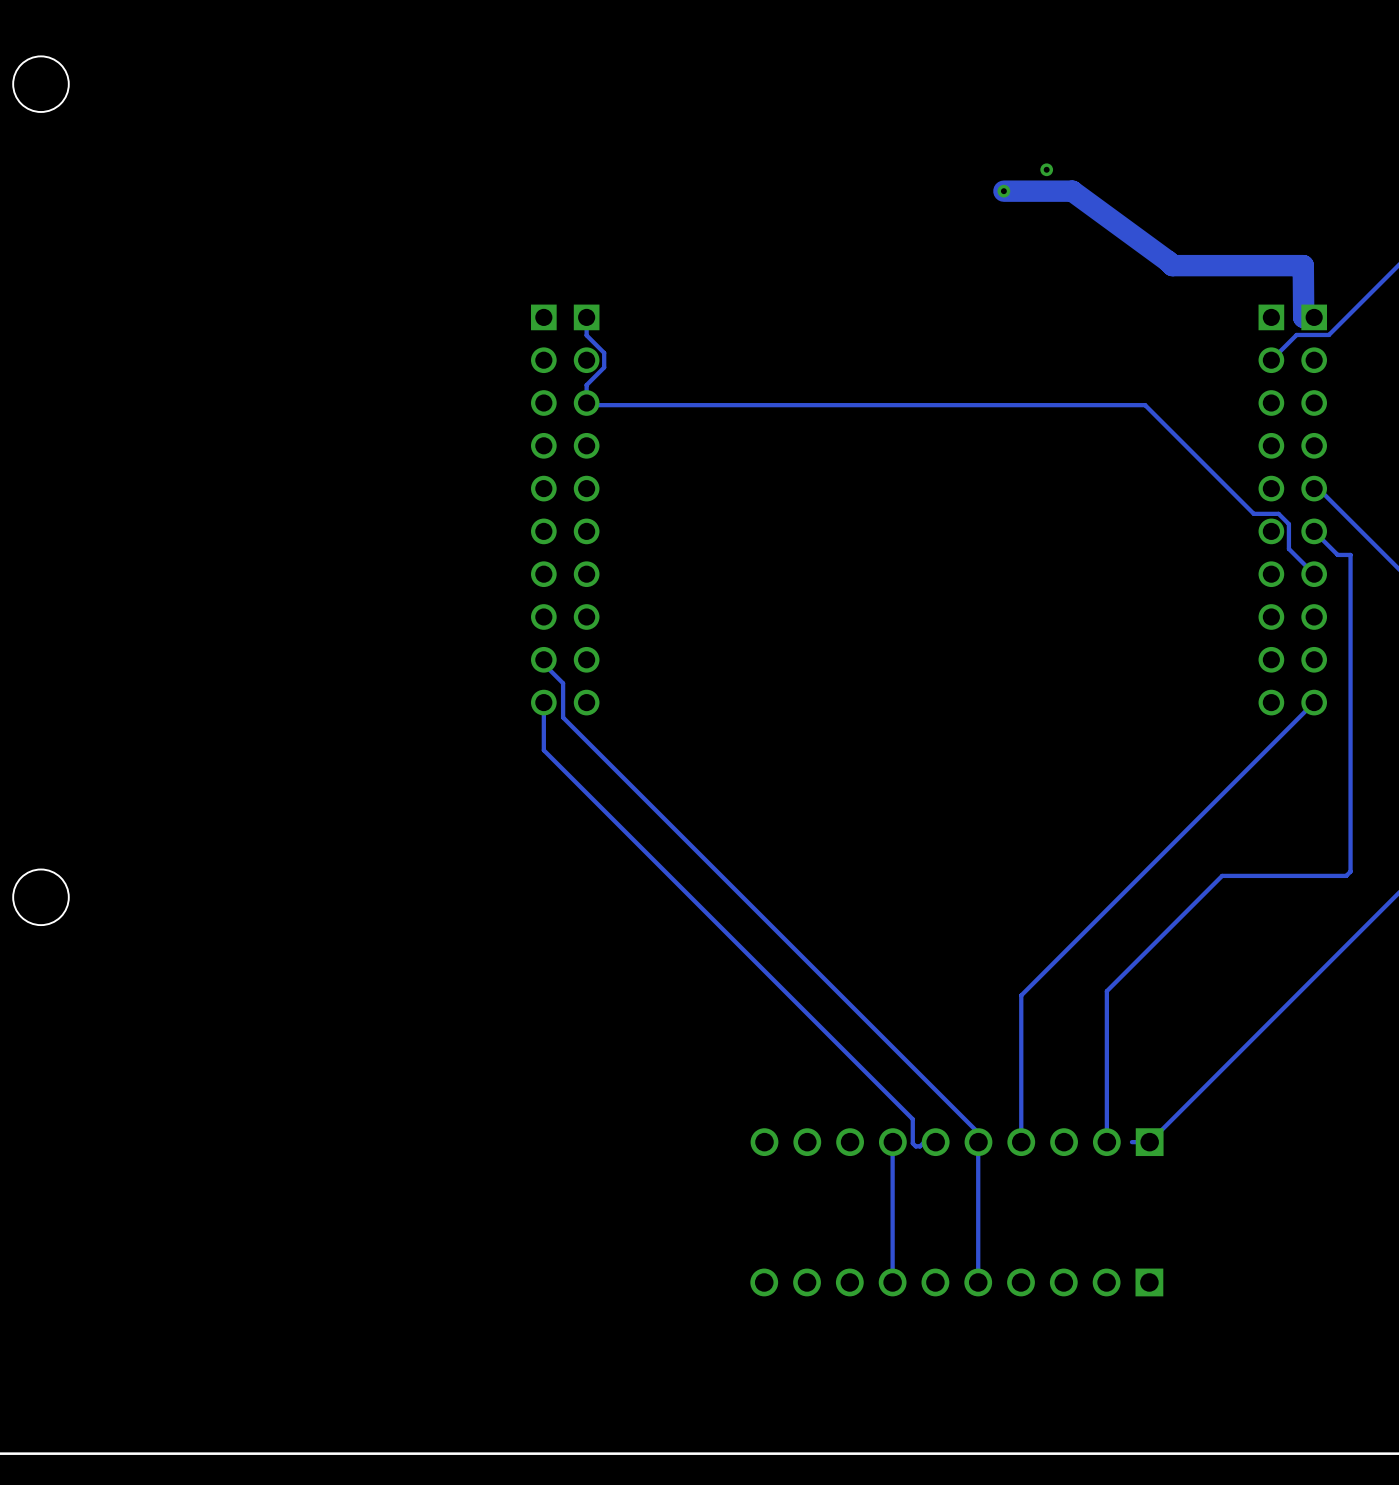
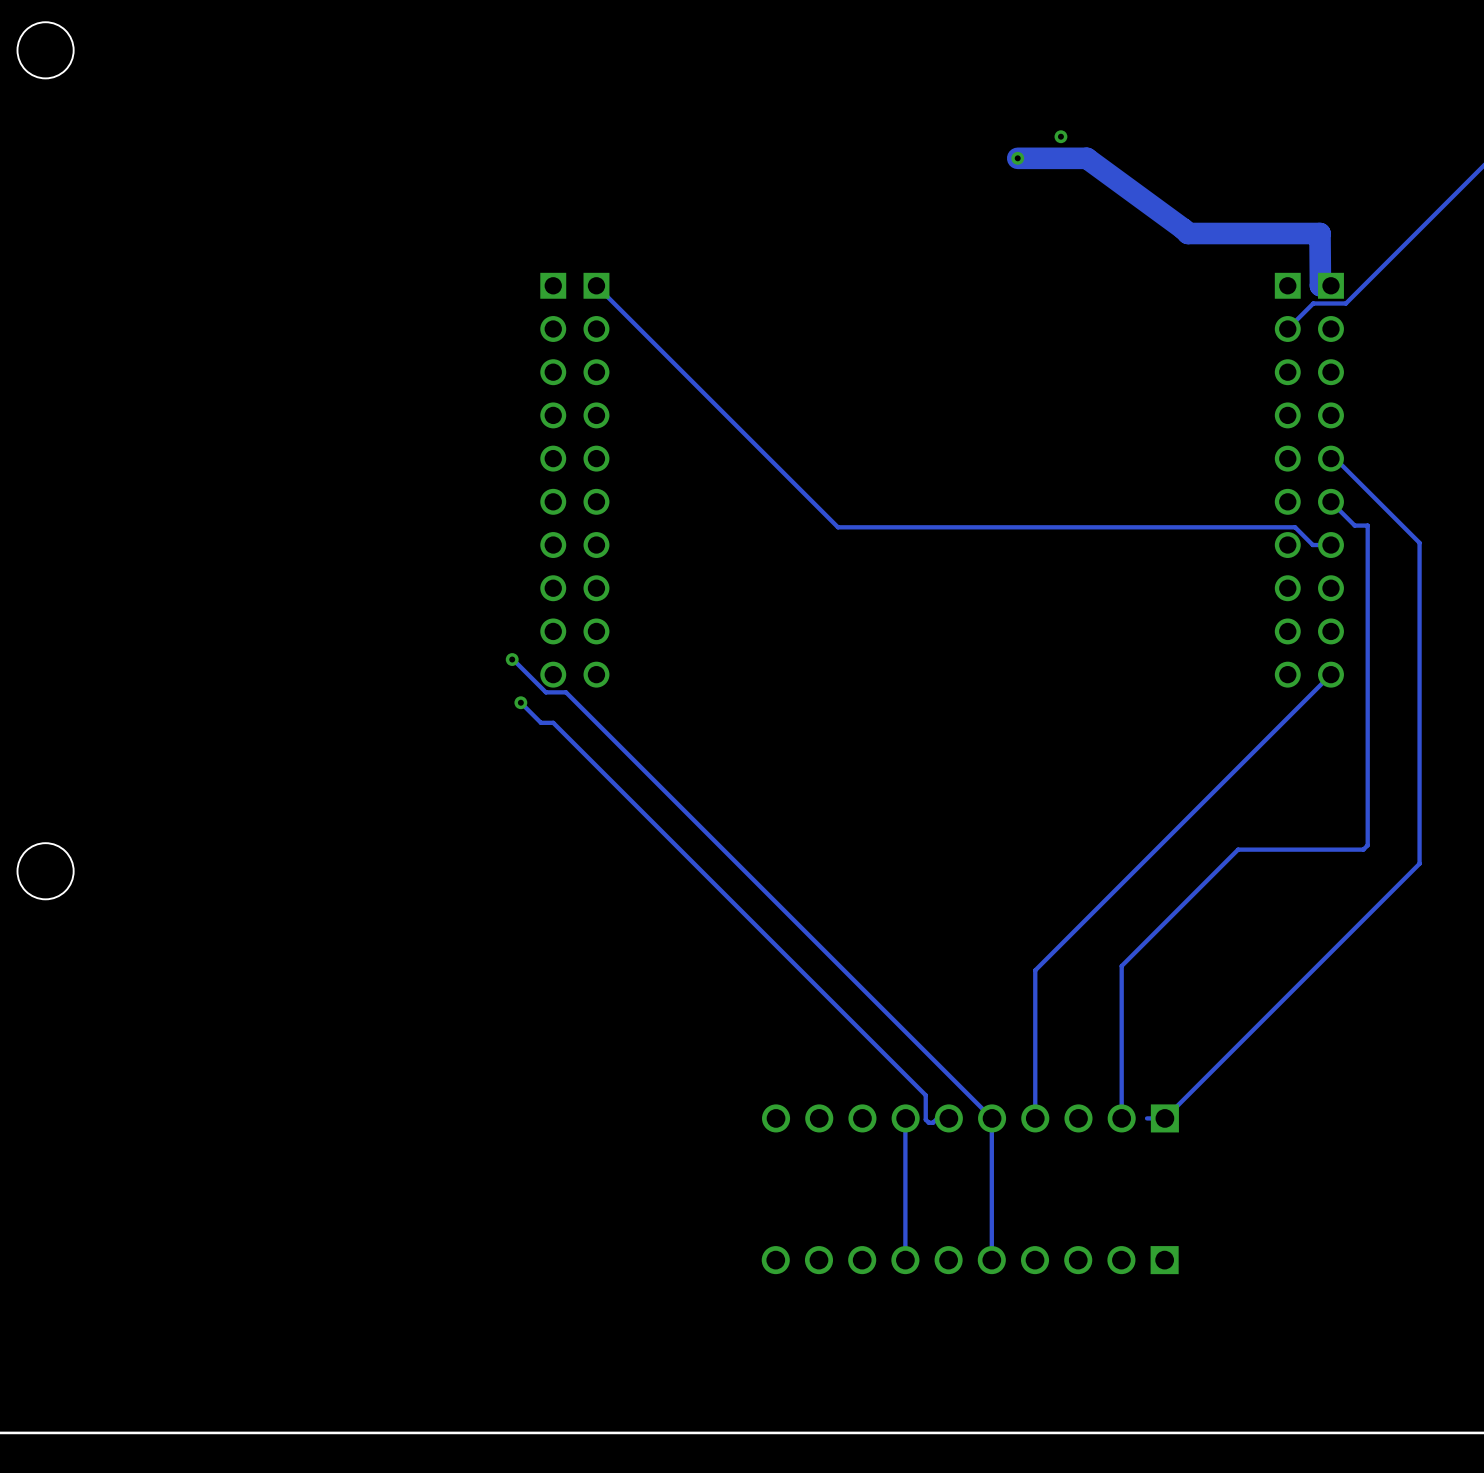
track: (586, 317) (586, 335) (604, 352) (604, 367) (586, 385) (586, 403) (588, 405) (1145, 405) (1253, 513) (1278, 513) (1288, 524) (1288, 548) (1314, 574) -> (596, 285) (837, 527) (1295, 527) (1312, 545) (1330, 545)
track: (543, 659) (543, 664) (563, 683) (563, 717) (978, 1132) (978, 1141) -> none
track: none -> (512, 659) (545, 692) (566, 692) (992, 1118)
via: none -> (512, 659)
track: (543, 702) (543, 750) -> (520, 702) (540, 722) (553, 722)
via: none -> (520, 702)

